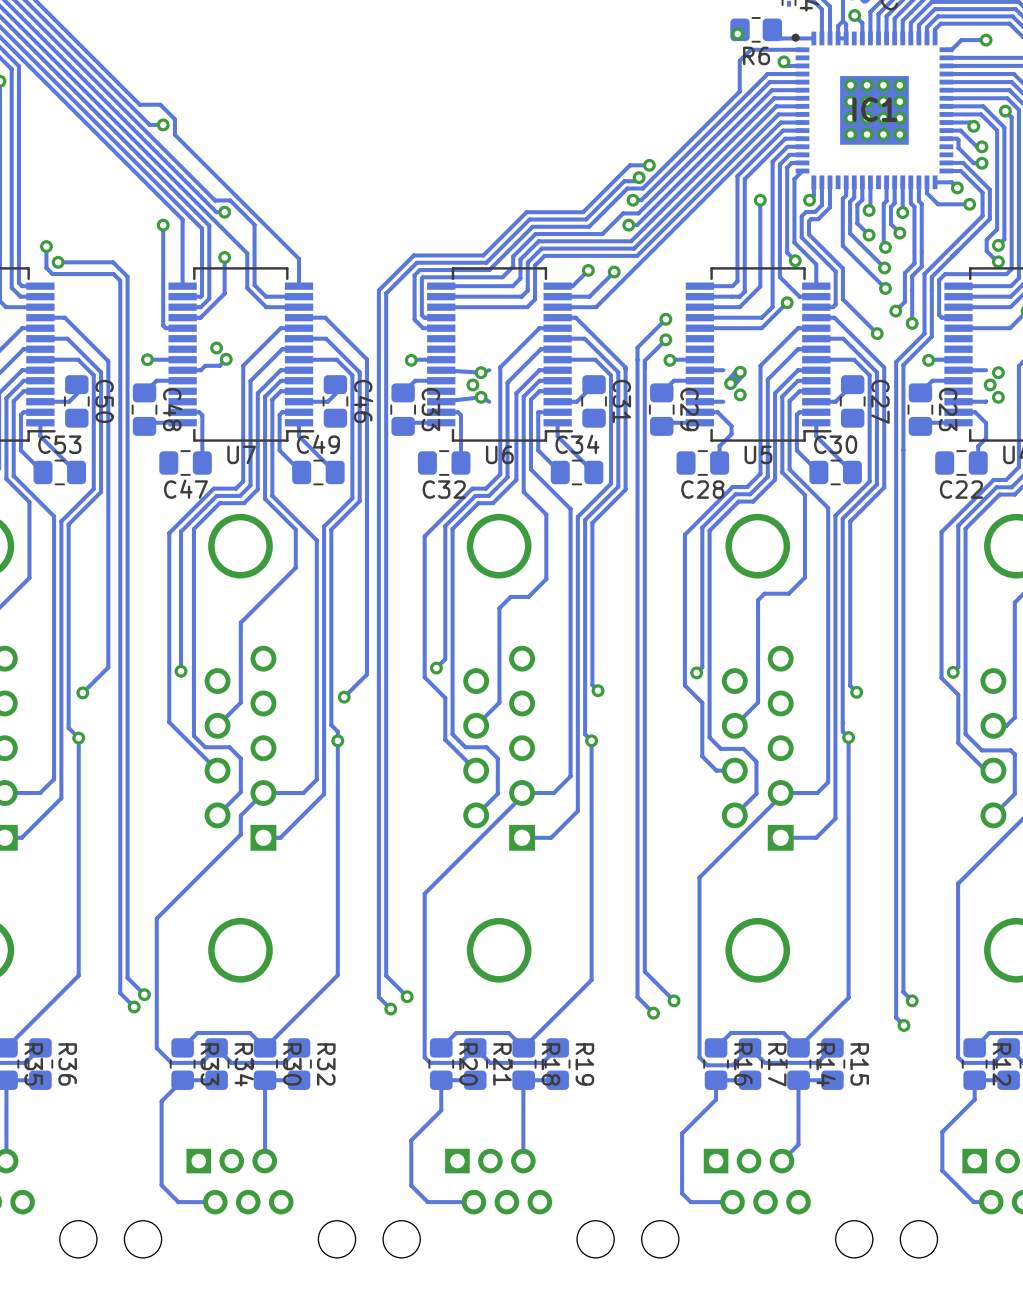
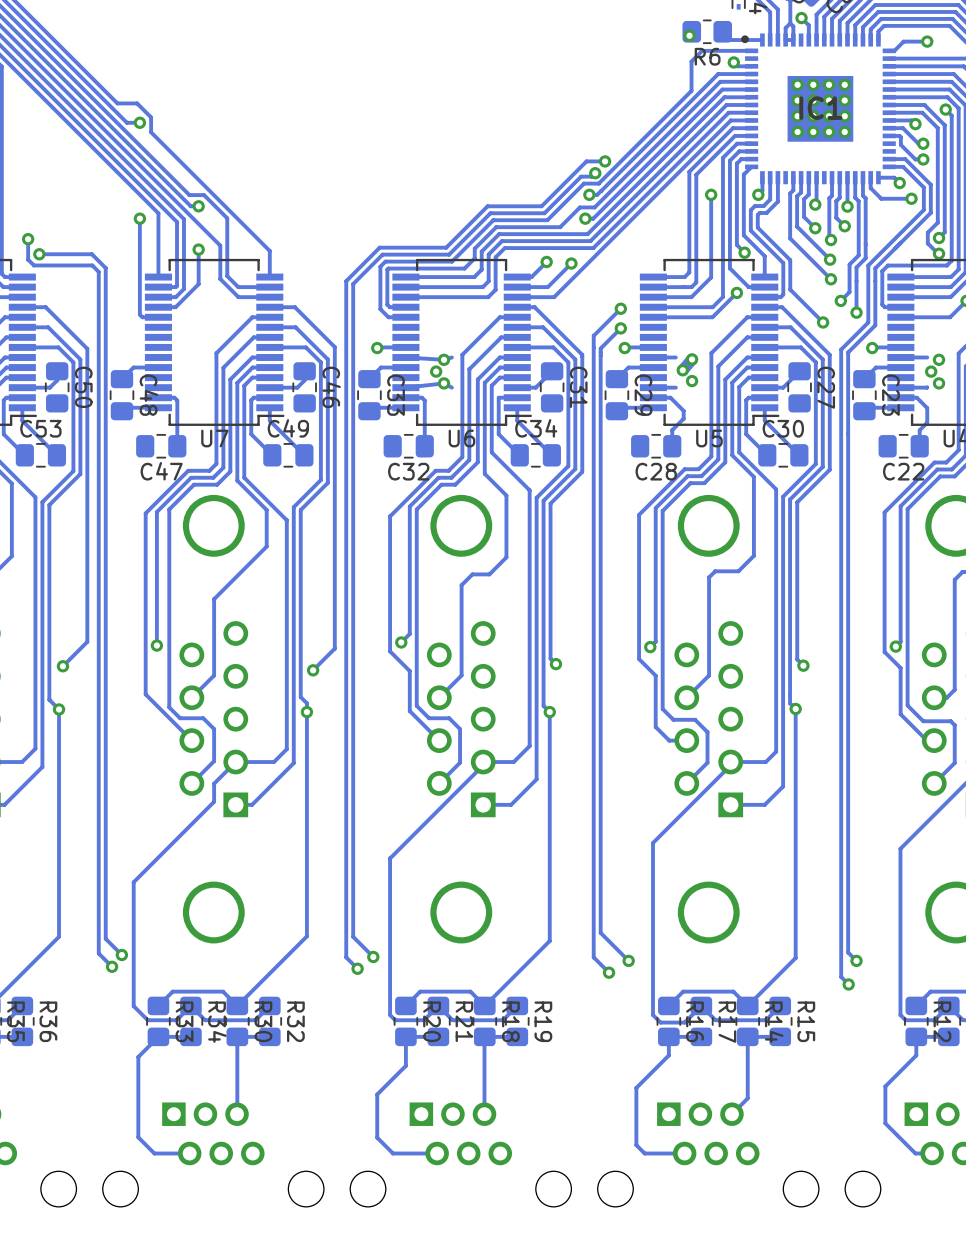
via: (216, 348) -> none
via: (147, 359) -> none
track: (182, 359) (147, 359) -> none
track: (226, 359) (219, 365) (205, 365) (200, 370) (182, 370) -> none
via: (226, 359) -> none

